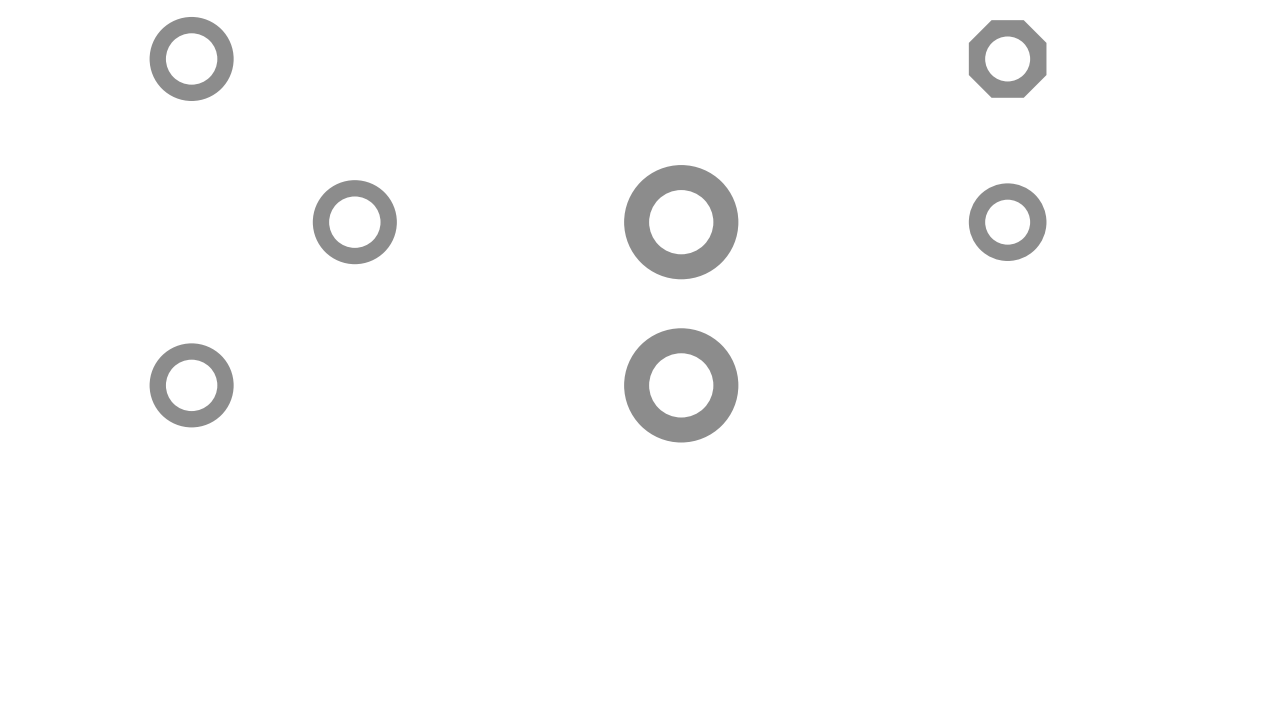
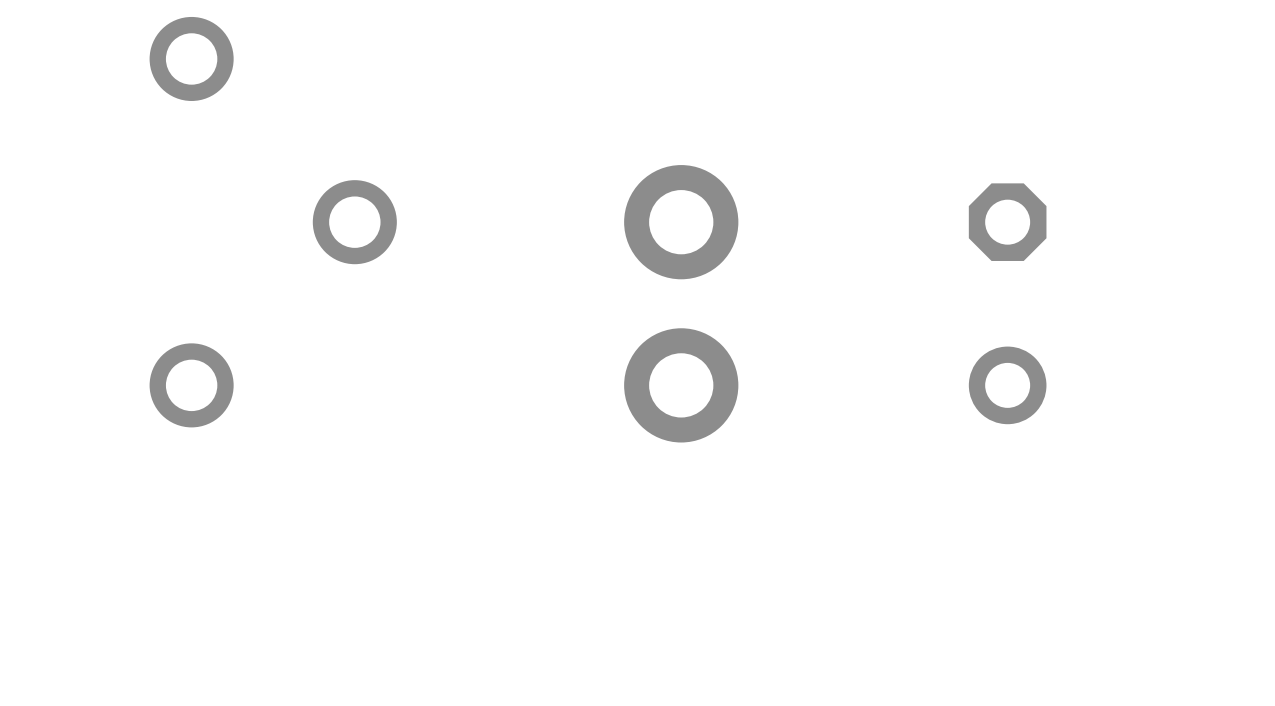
part position: (1007, 140) -> (1007, 303)

